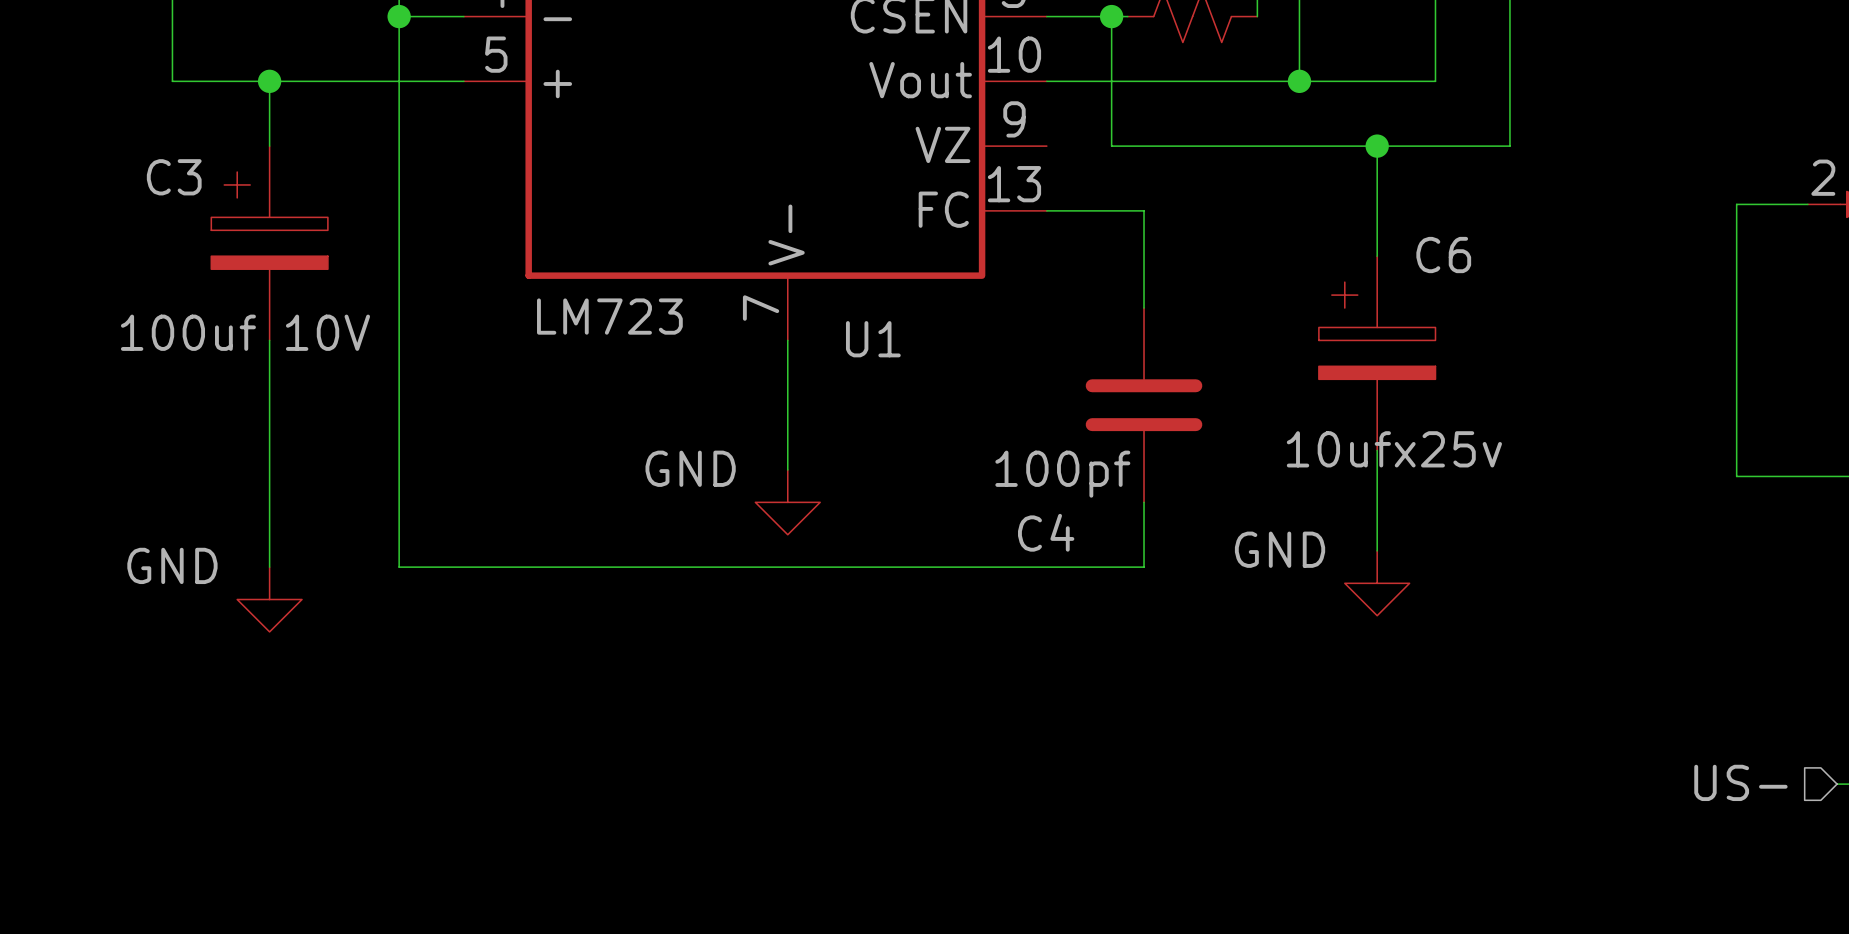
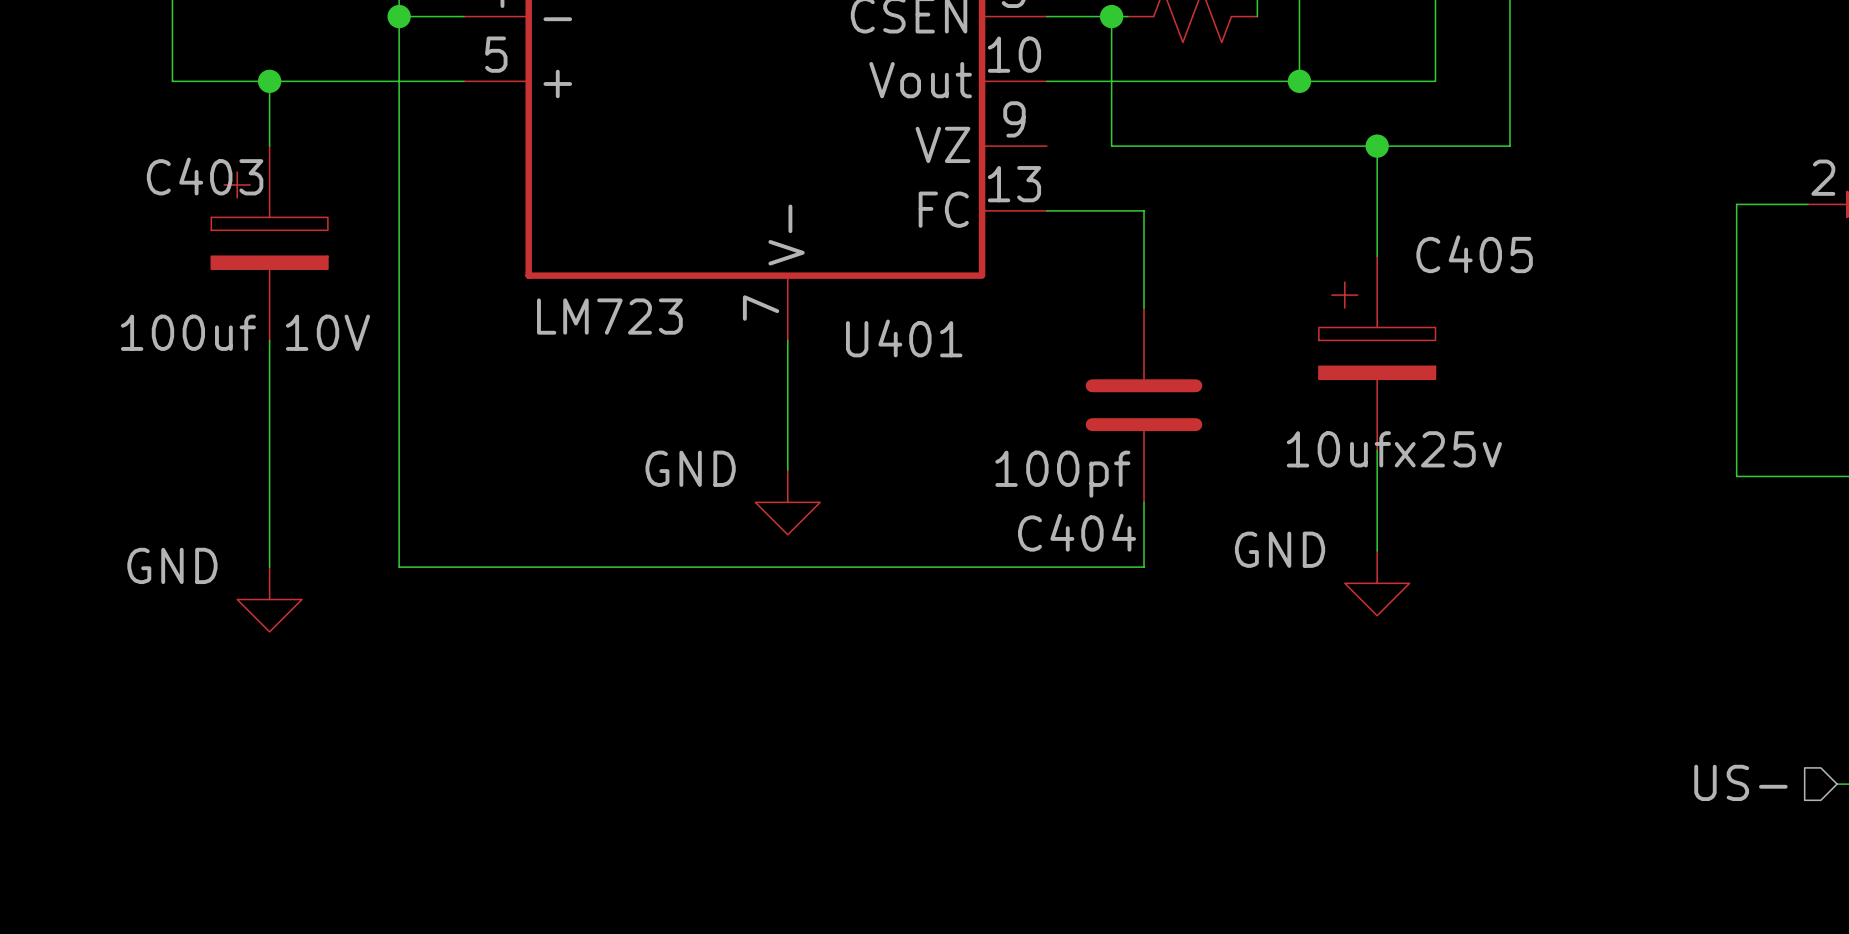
C3 name: C3 (174, 177) -> C403 (205, 176)
C6 name: C6 (1443, 255) -> C405 (1474, 254)
U1 name: U1 (873, 339) -> U401 (904, 338)
C4 name: C4 (1046, 532) -> C404 (1077, 532)

